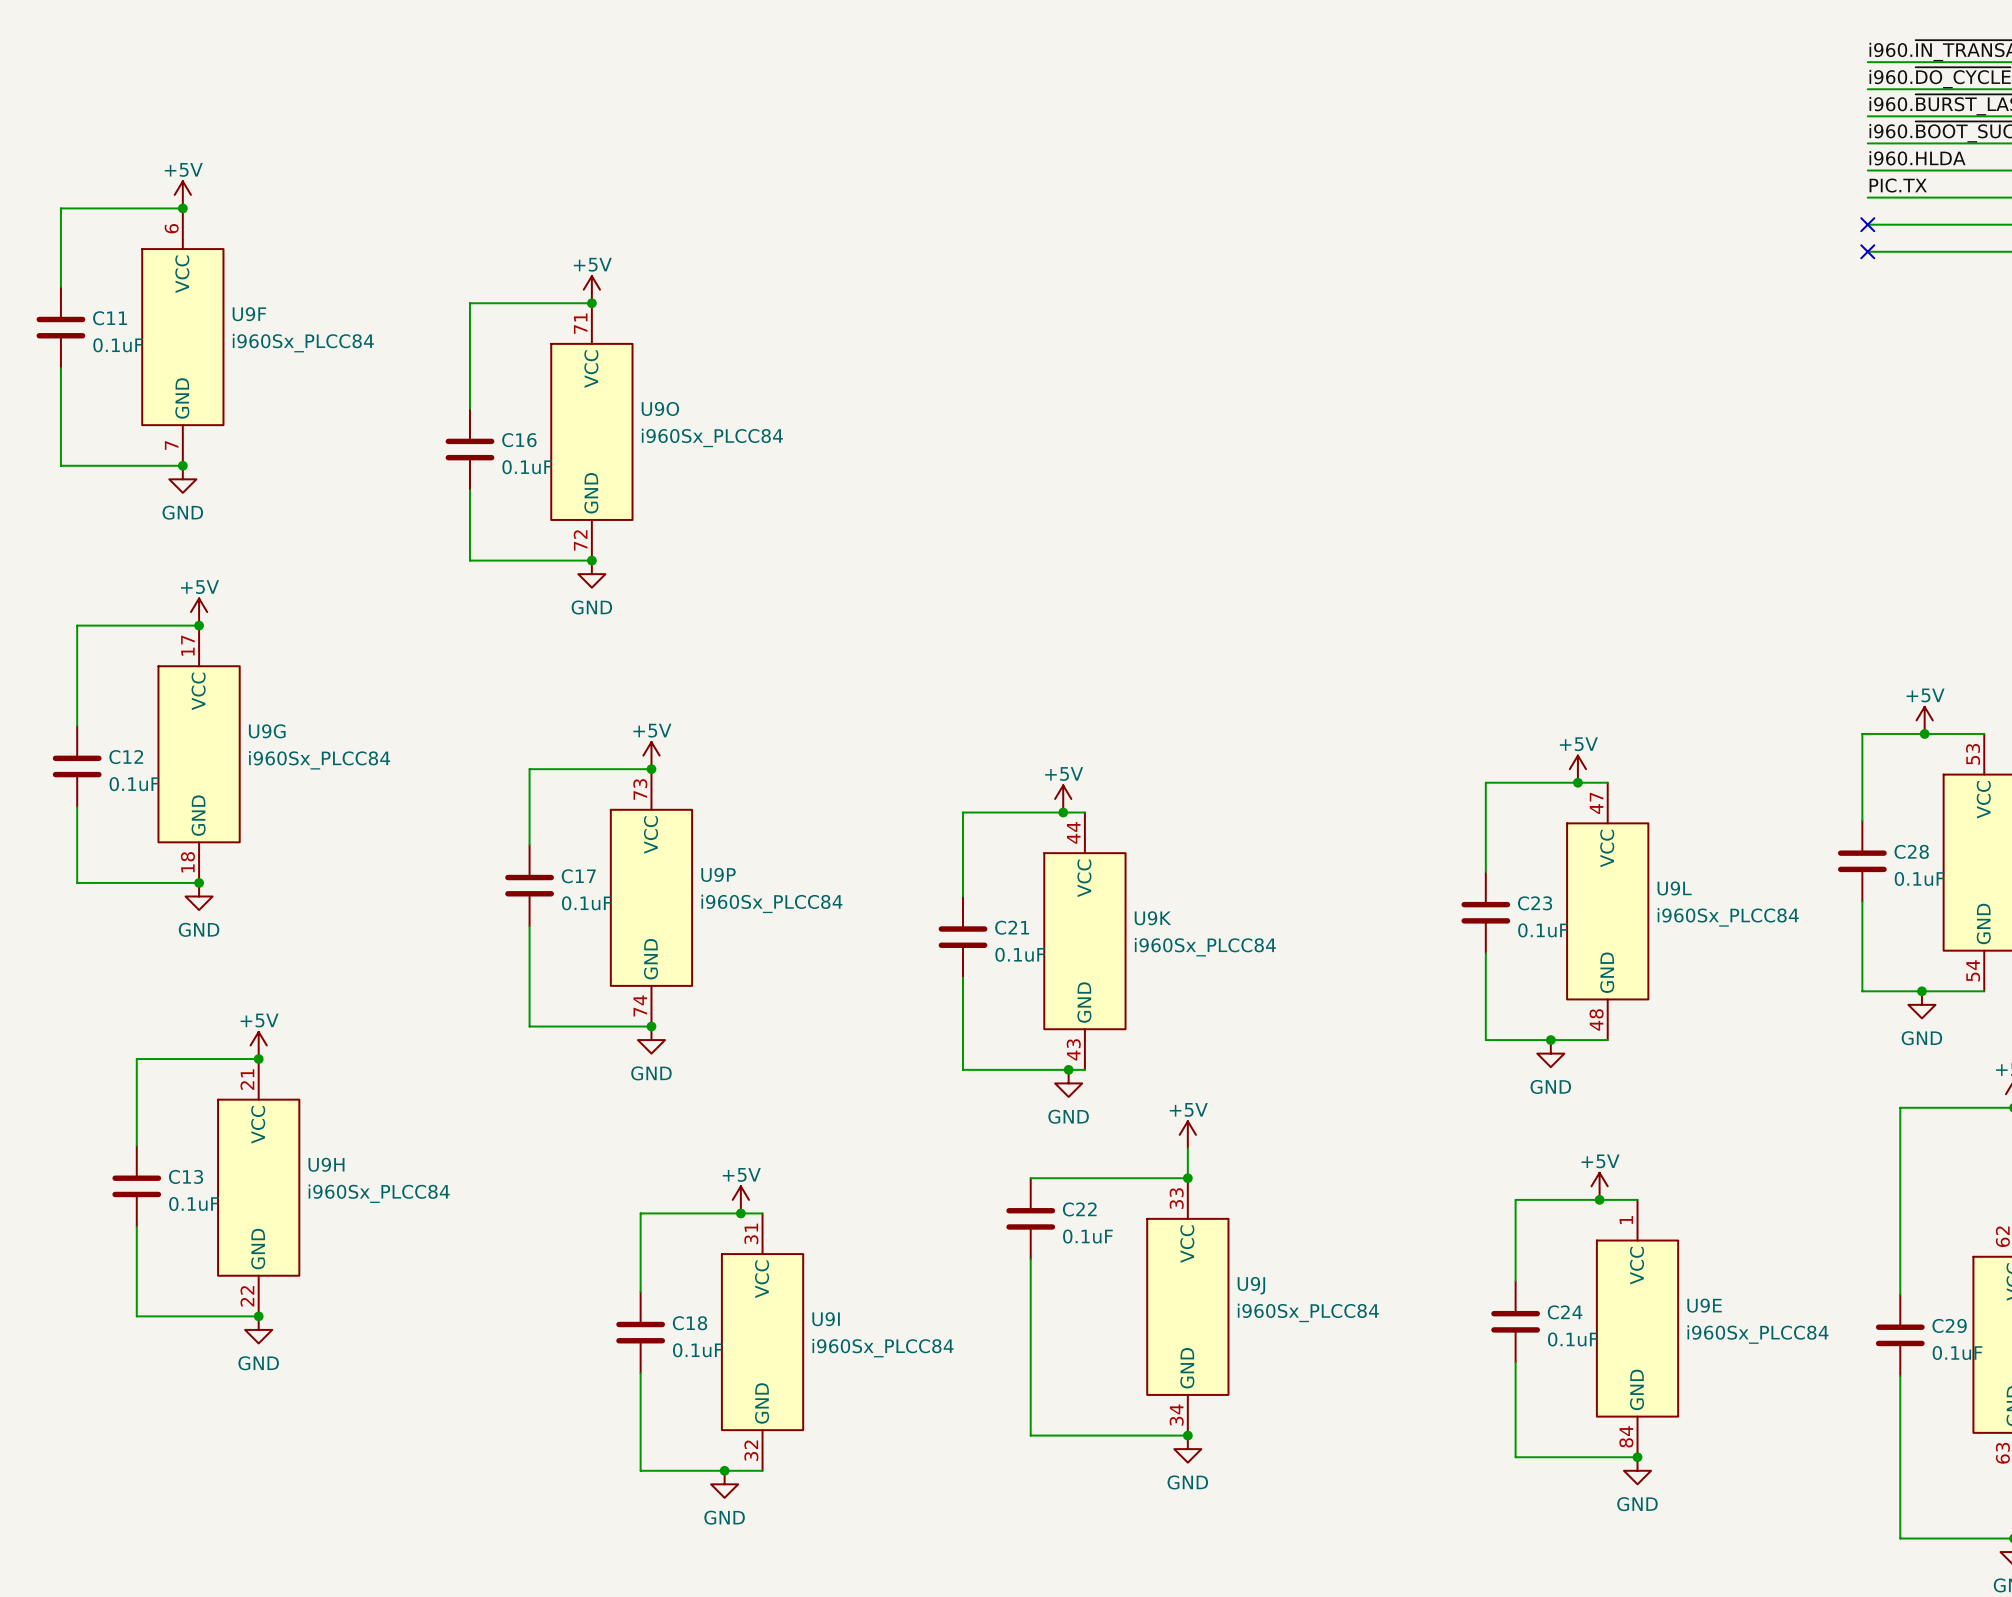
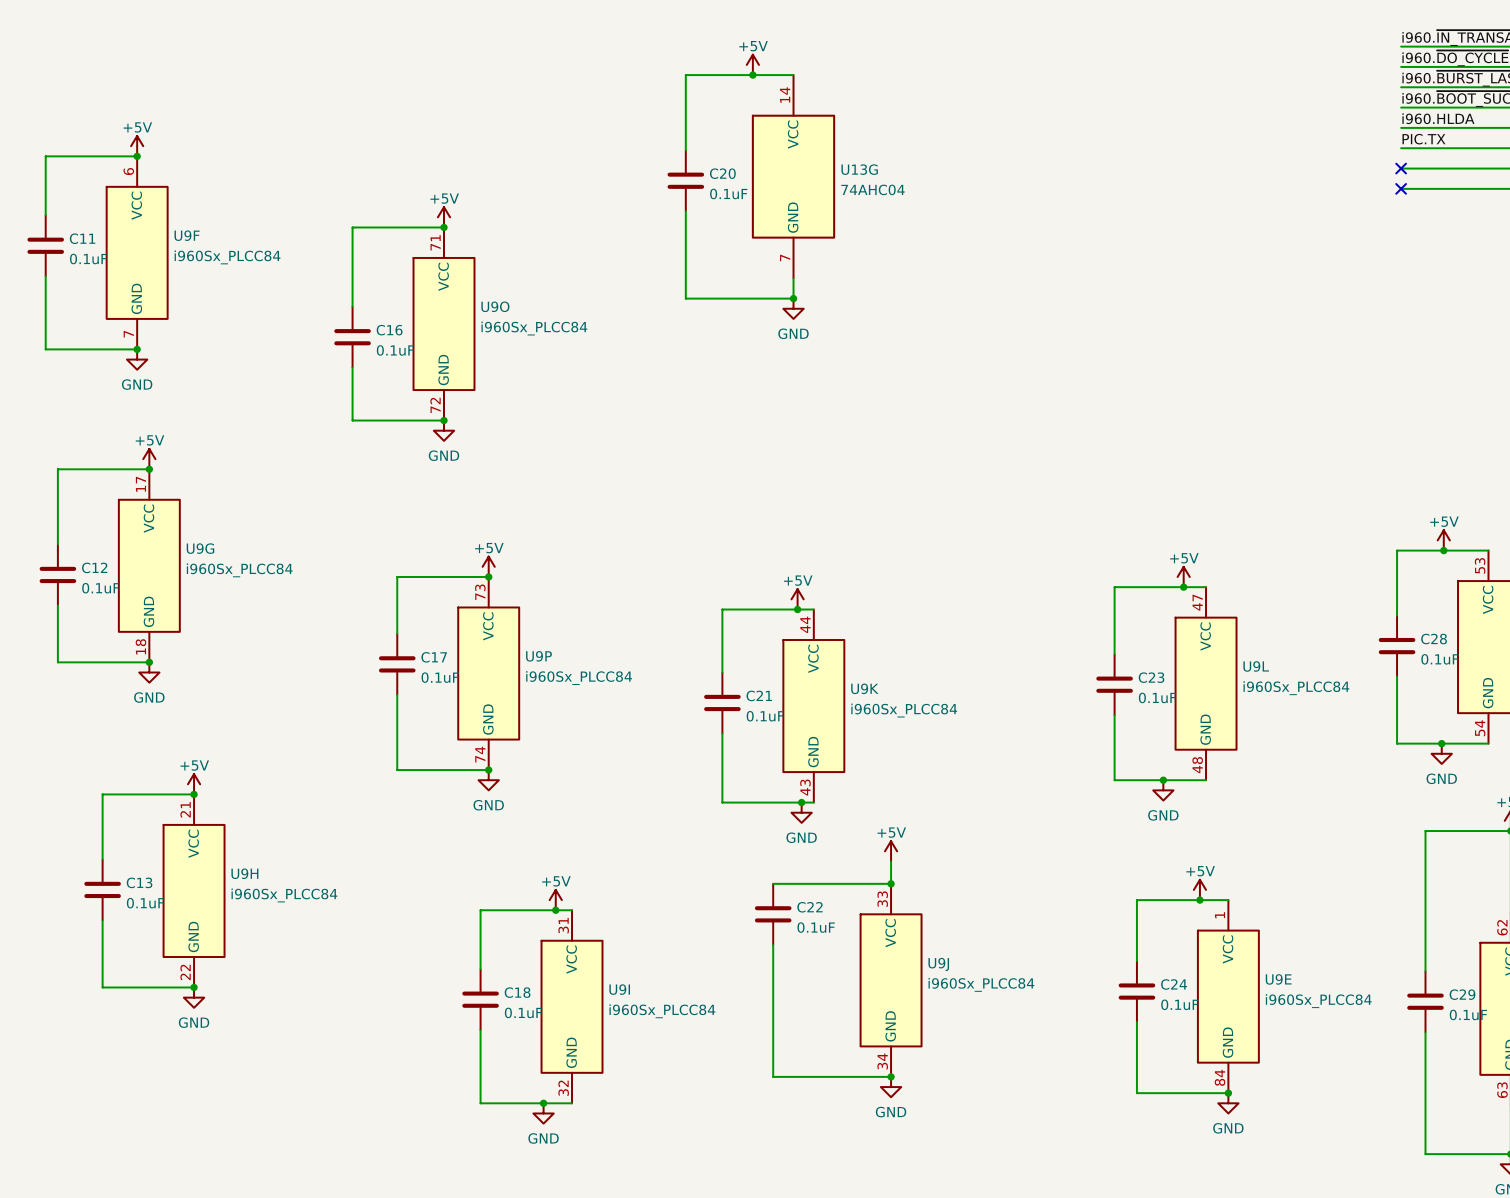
power symbol: none -> +5V (752, 64)
junction: none -> (752, 75)
wire: none -> (793, 75) (685, 75) (685, 150)
U13G: none -> 74AHC04 (793, 176)
C20: none -> 0.1uF (685, 180)
wire: none -> (685, 211) (685, 298) (793, 298) (793, 278)
junction: none -> (793, 298)
power symbol: none -> GND (793, 308)

